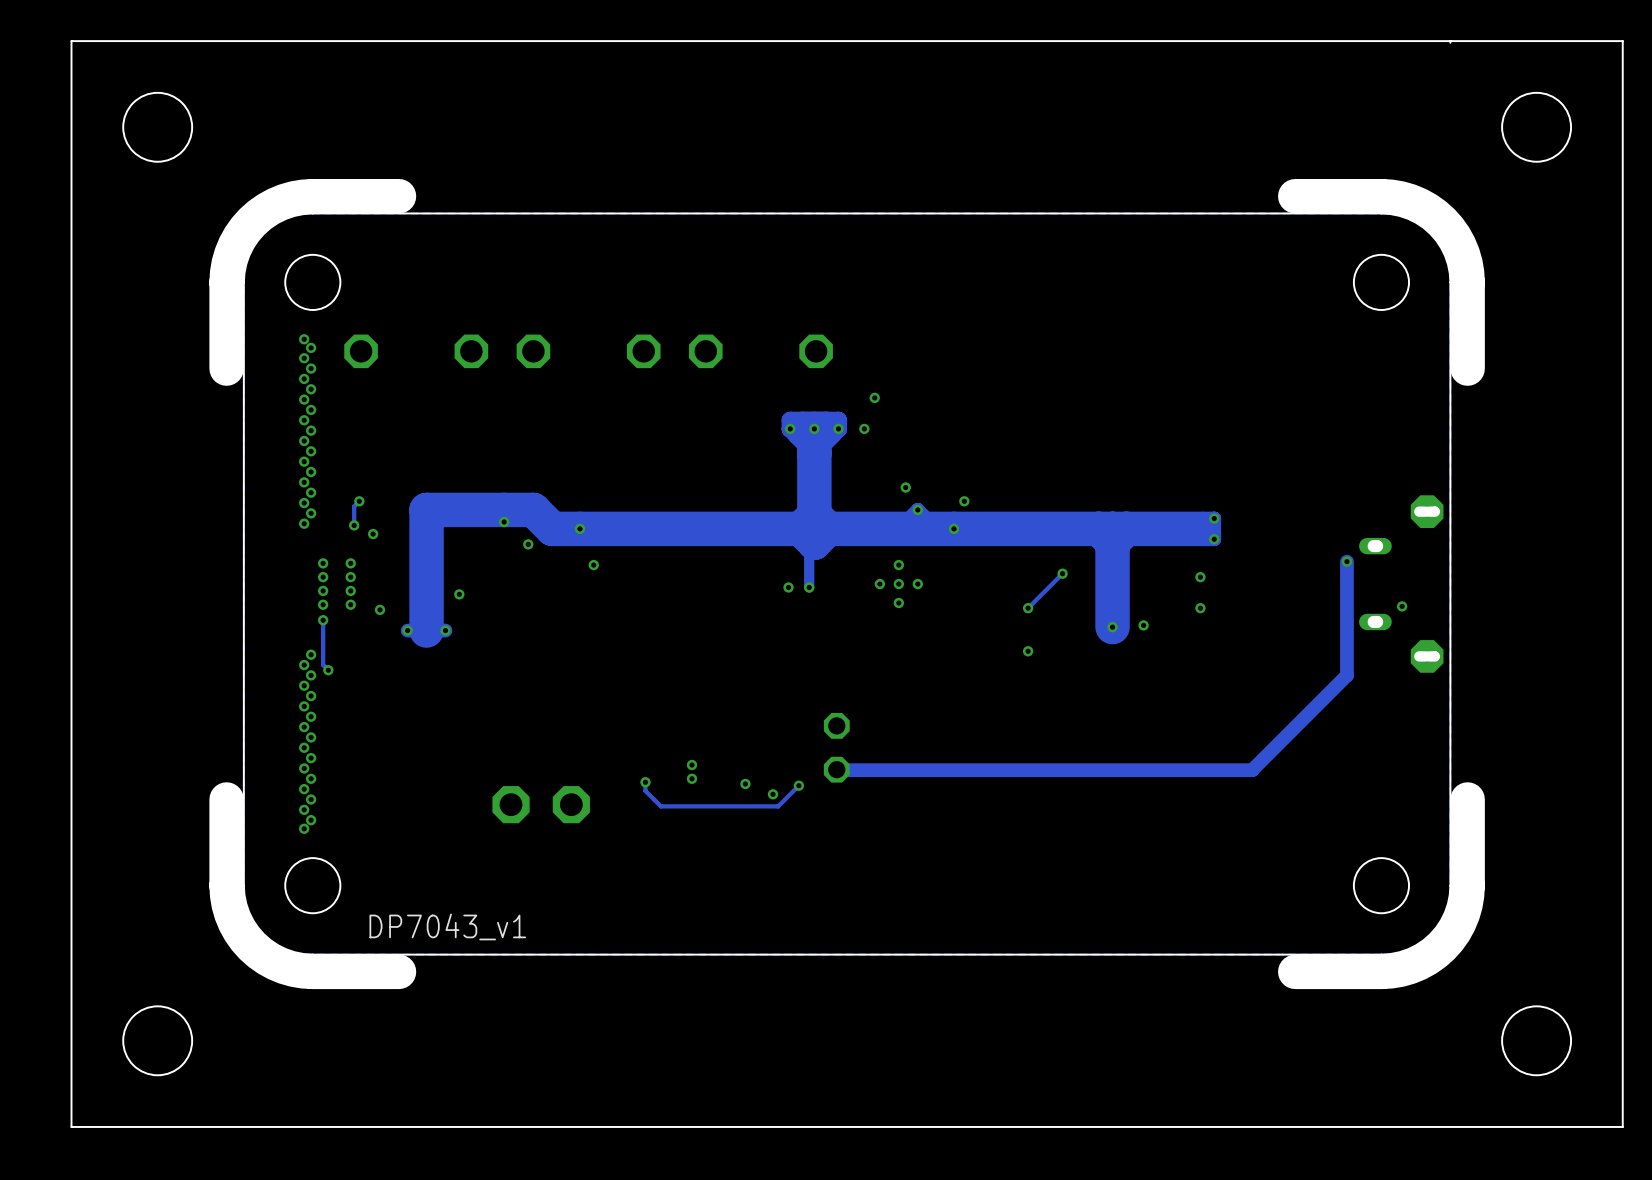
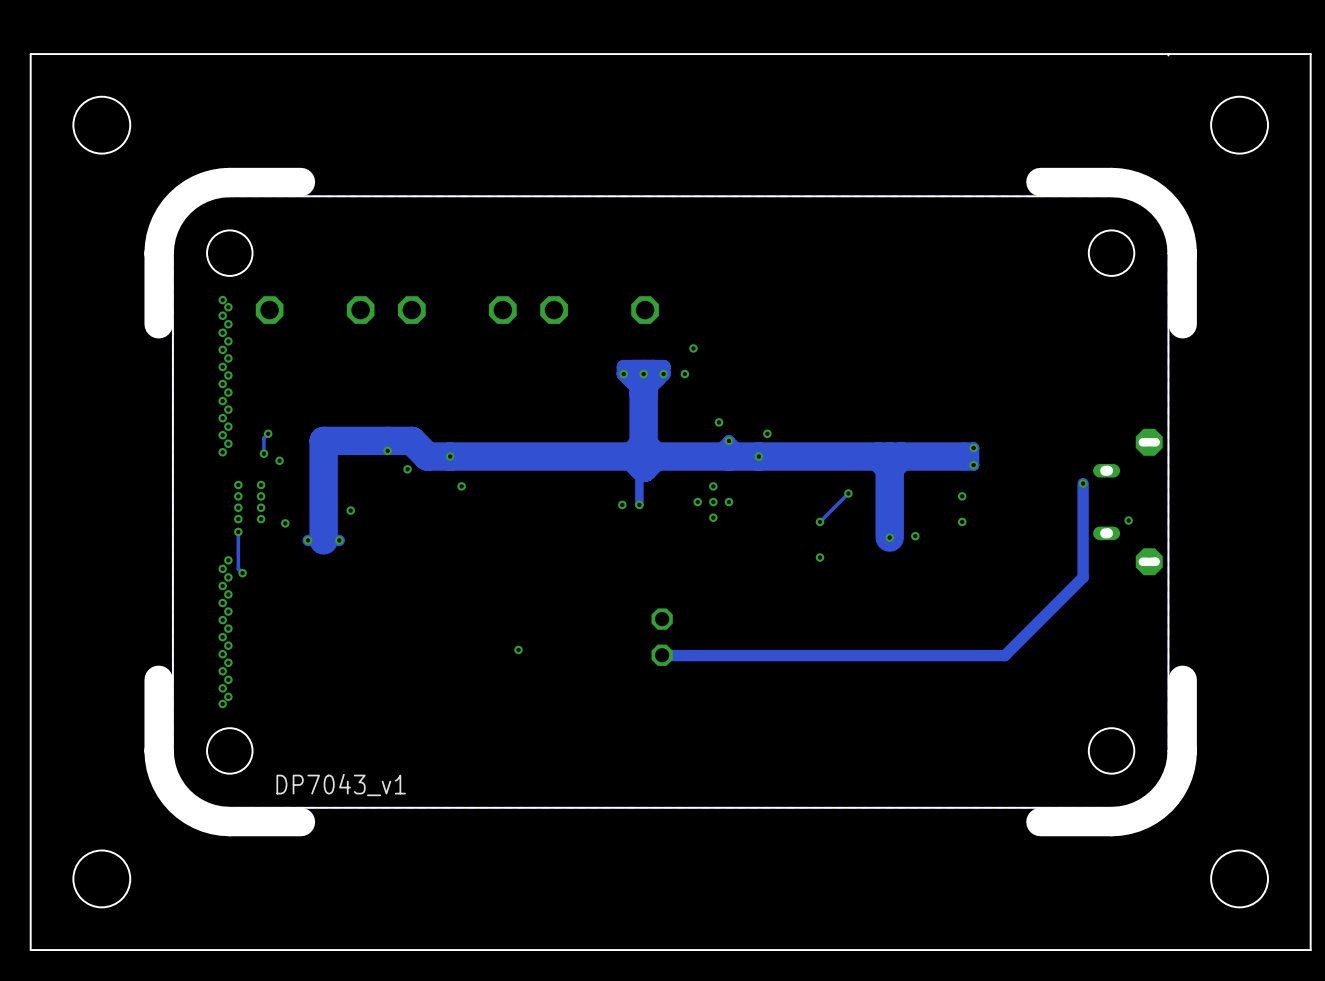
via: none -> (518, 649)
via: (692, 765) -> none
via: (692, 778) -> none
track: (645, 782) (645, 790) (660, 806) (778, 806) (798, 785) -> none
via: (645, 782) -> none
via: (745, 783) -> none
via: (798, 785) -> none
via: (773, 794) -> none
part: (511, 804) -> none
part: (571, 804) -> none

